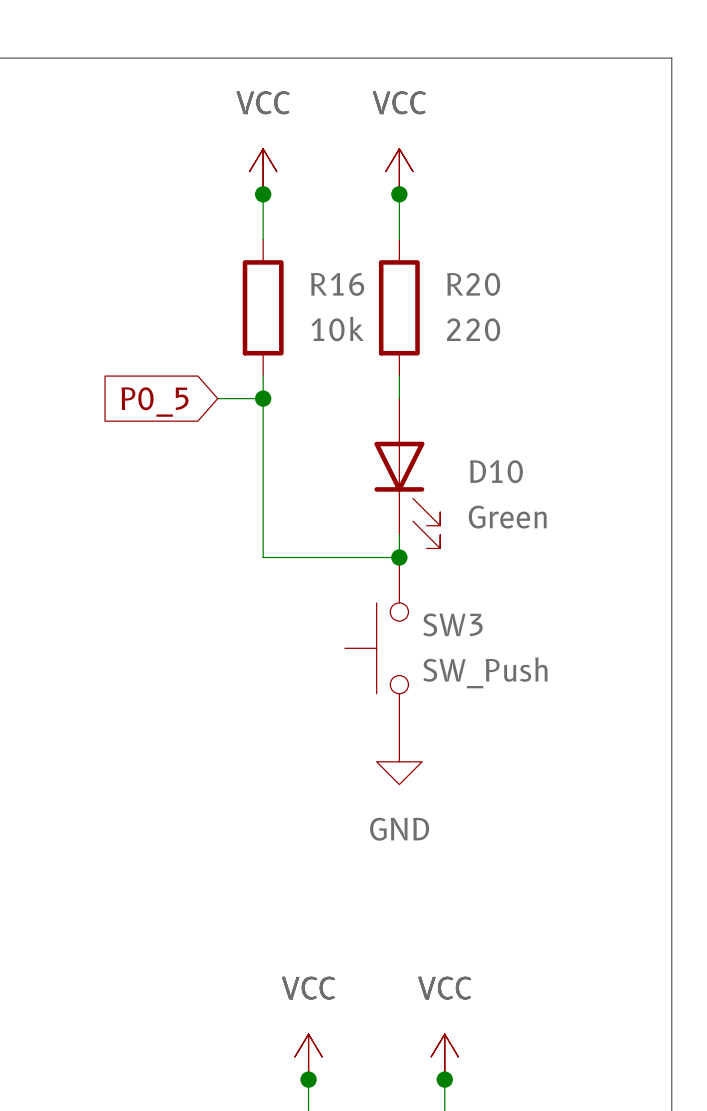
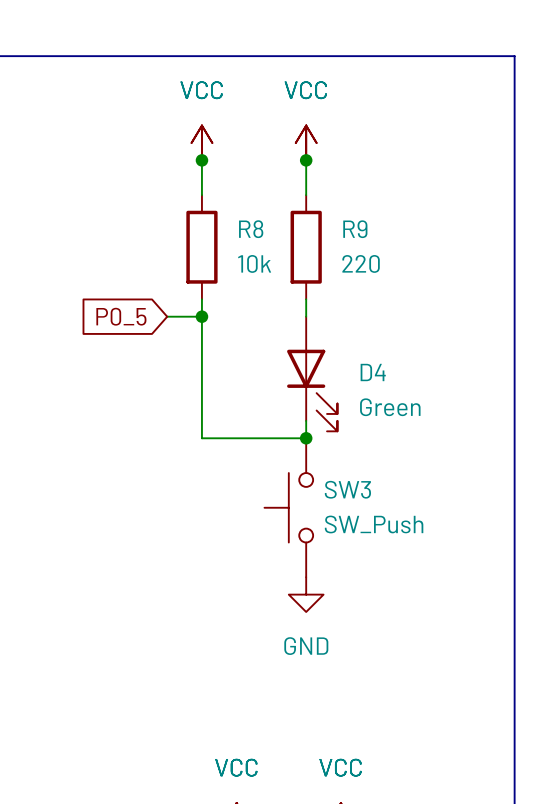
R16 name: R16 (337, 284) -> R8 (251, 229)
R20 name: R20 (473, 284) -> R9 (355, 229)
D10 name: D10 (496, 471) -> D4 (373, 372)

